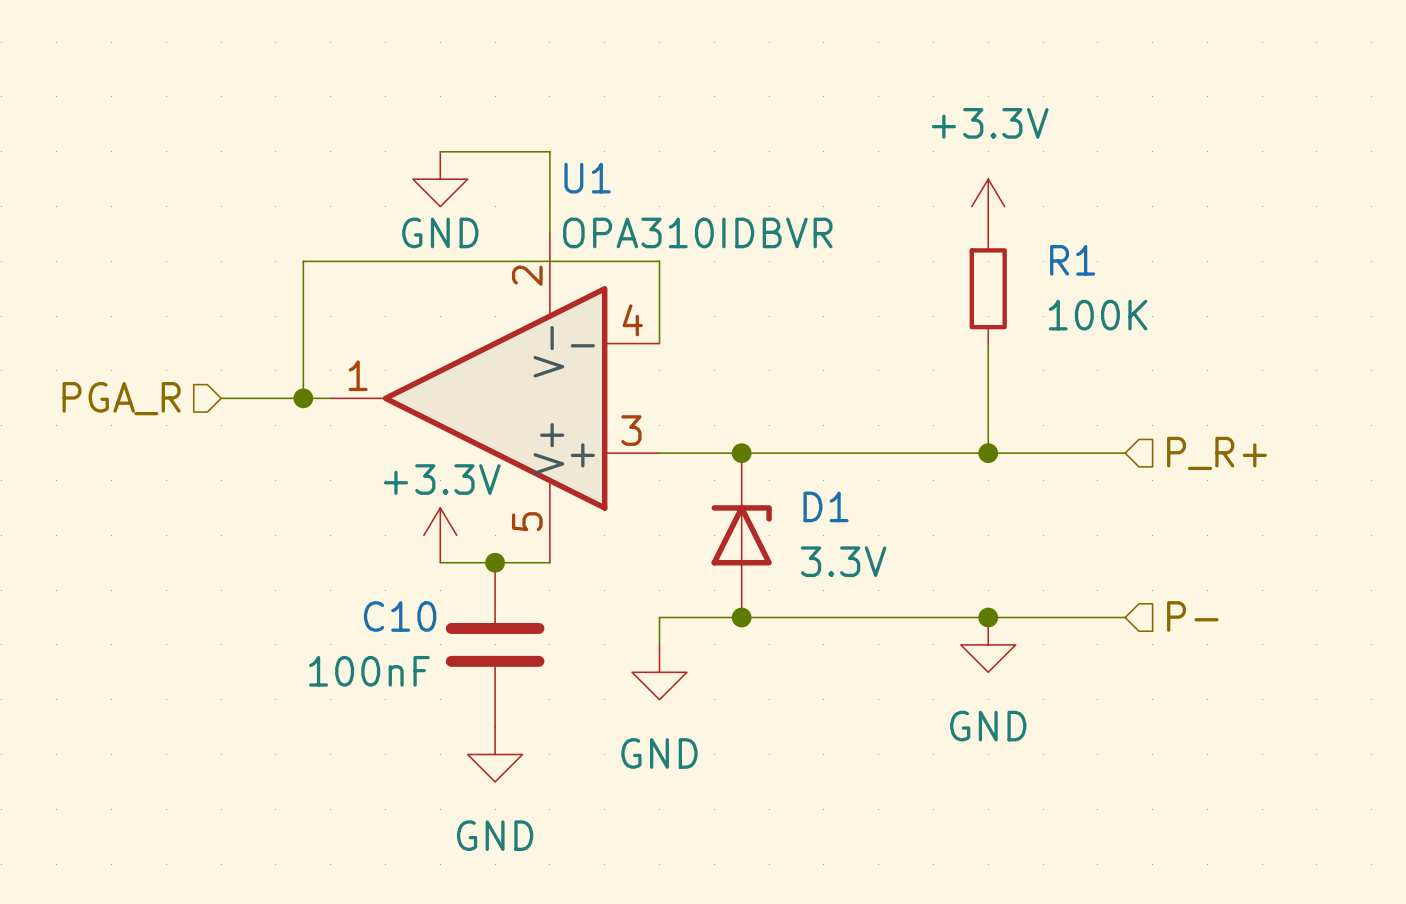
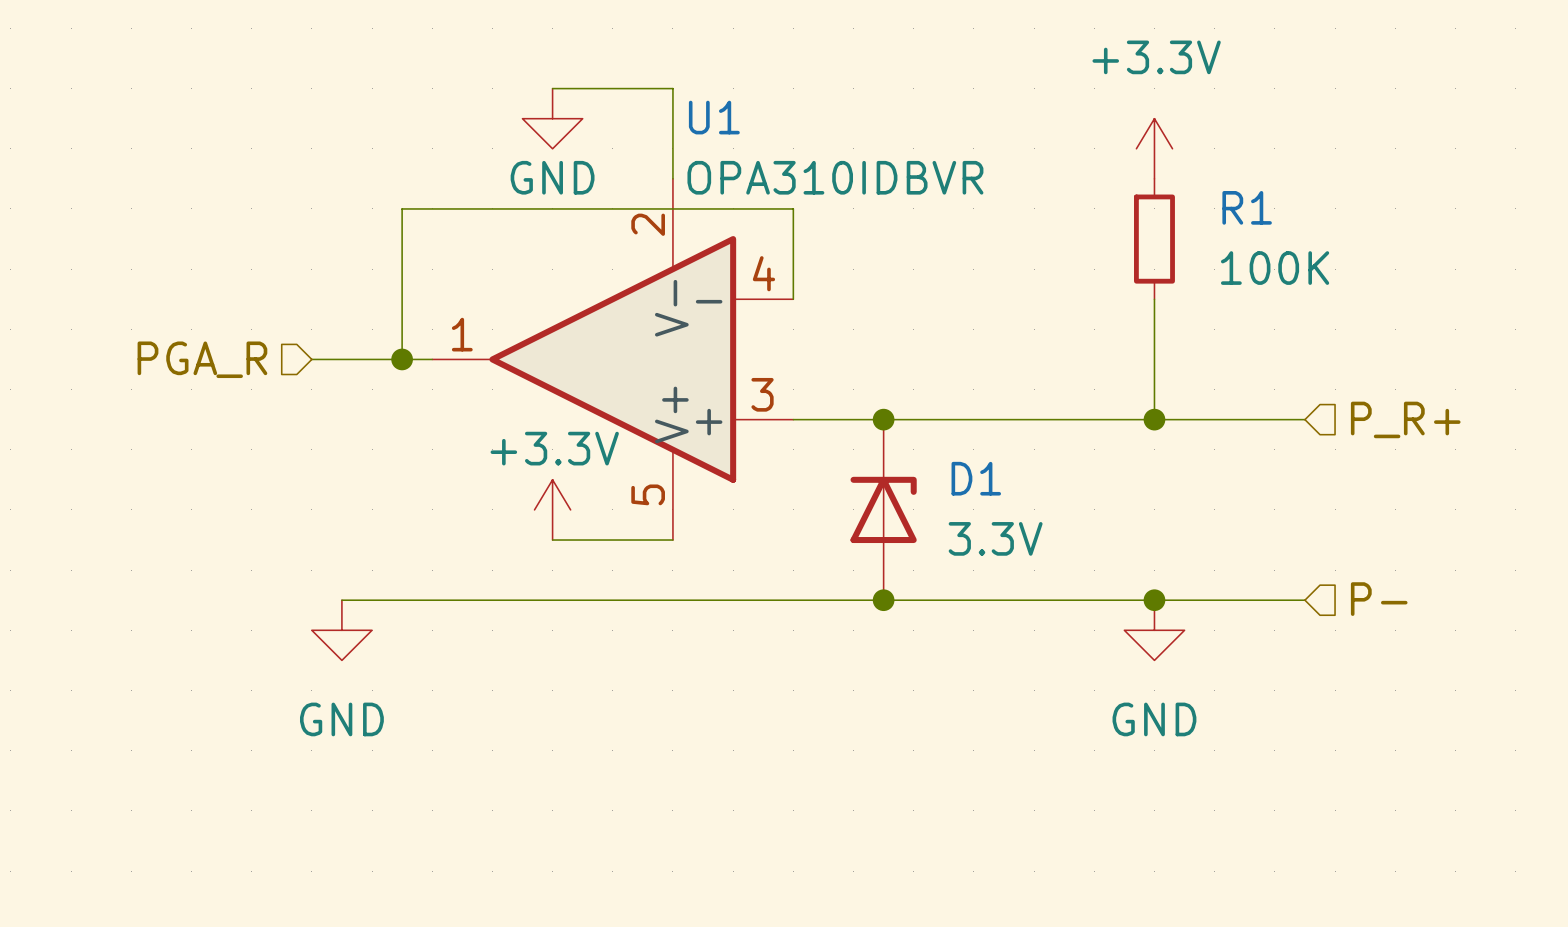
junction: (495, 562) -> none
wire: (659, 617) (659, 644) -> (793, 600) (341, 600)
power symbol: none -> GND (341, 630)
C10: 100nF (495, 644) -> none
power symbol: GND (659, 672) -> none
power symbol: GND (495, 754) -> none

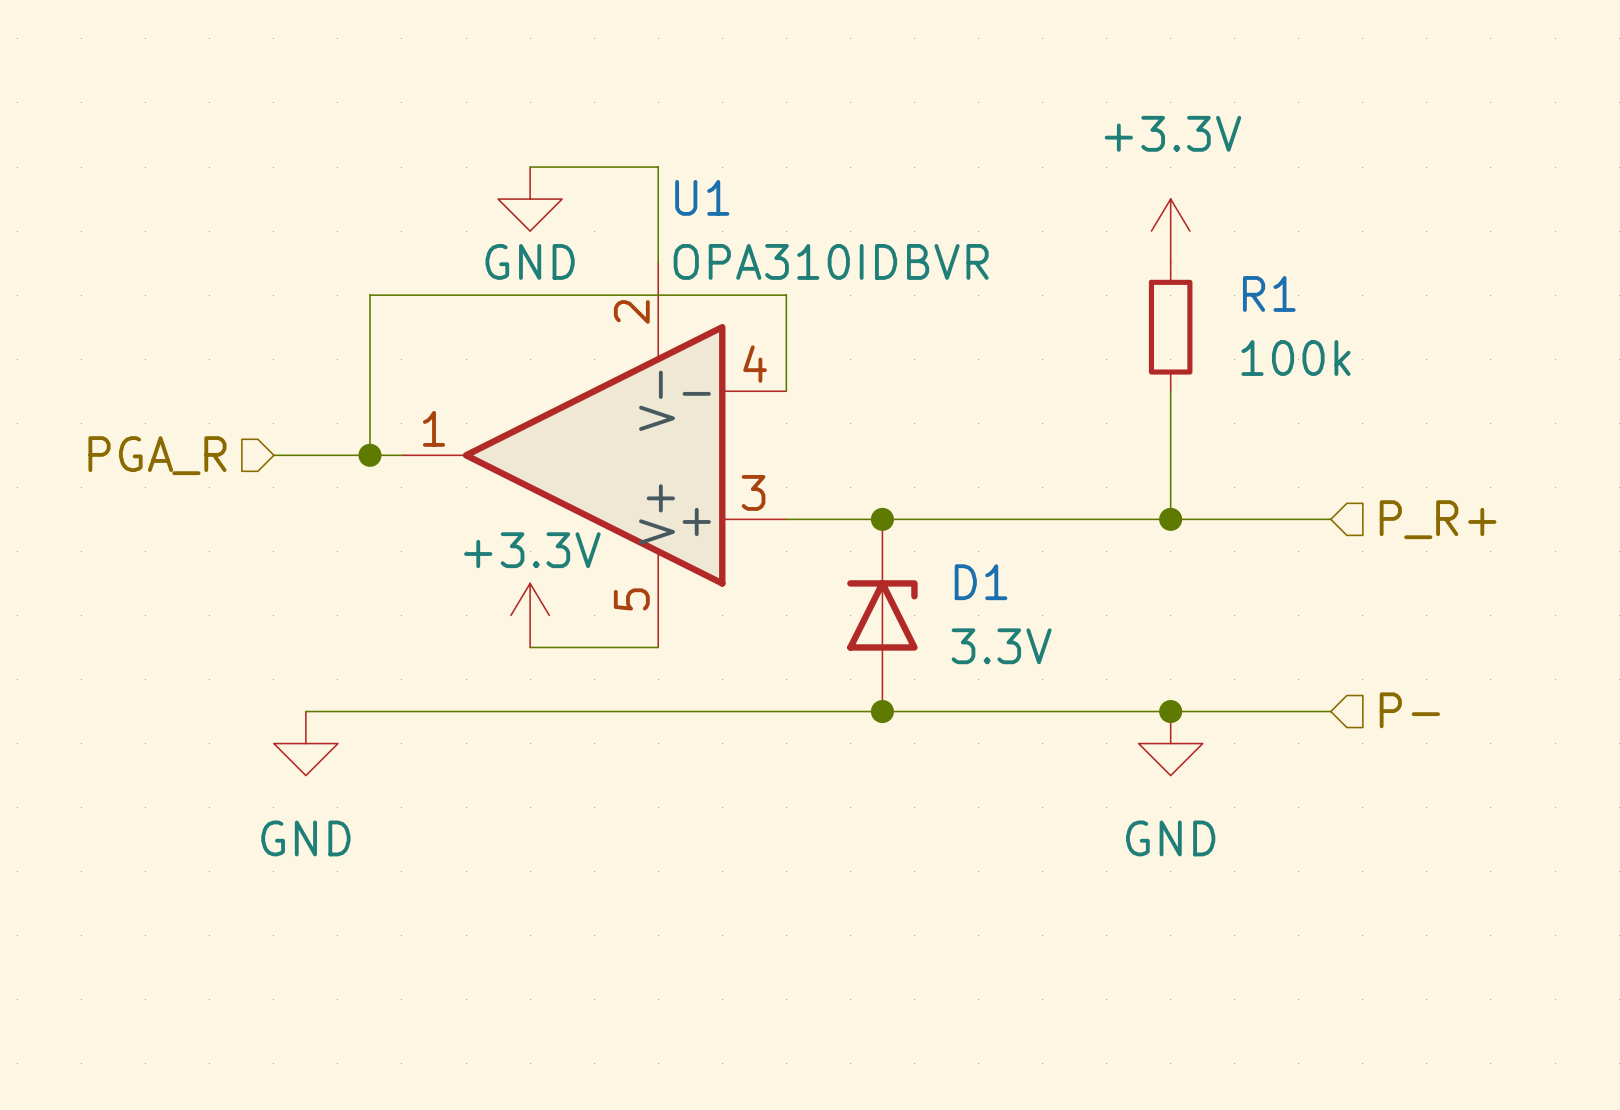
R1 value: 100K (1275, 268) -> 100k (1295, 358)

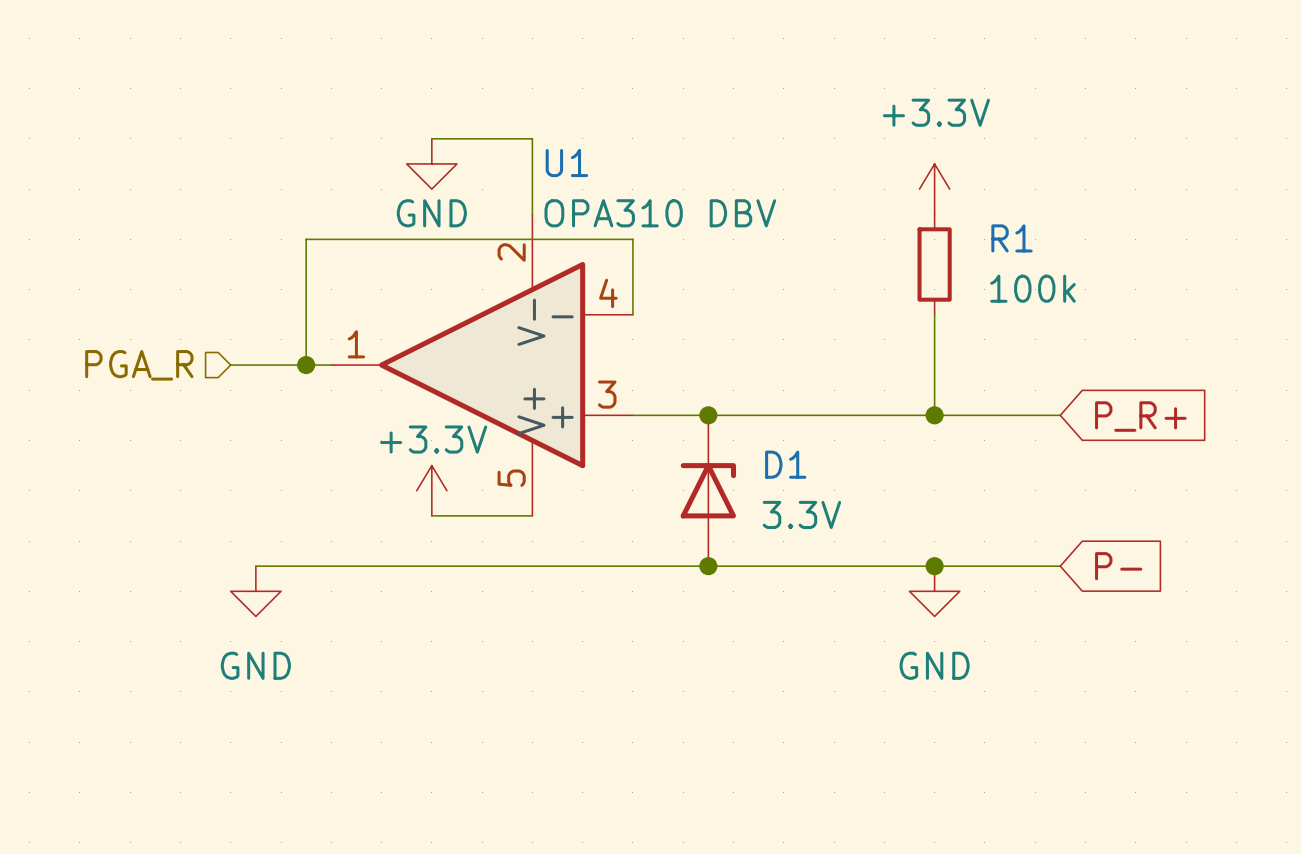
U1 value: OPA310IDBVR (831, 261) -> OPA310 DBV (660, 213)
hierarchical label: P_R+ (1438, 519) -> none
global label: none -> P_R+ (1140, 416)
hierarchical label: P- (1409, 710) -> none
global label: none -> P- (1118, 566)

